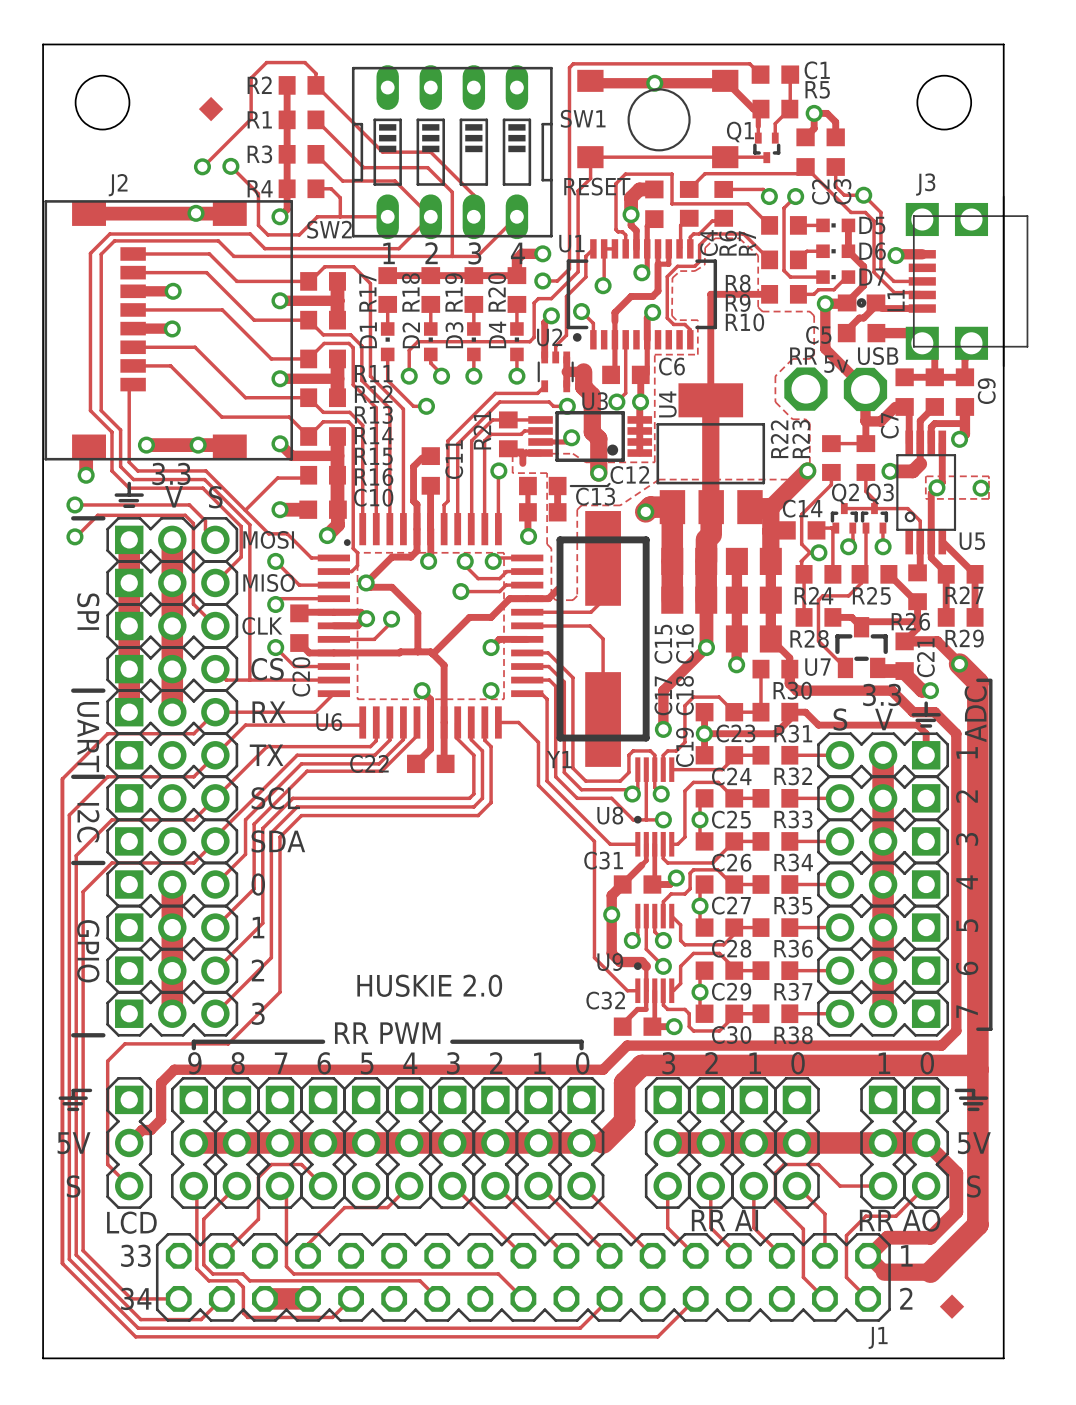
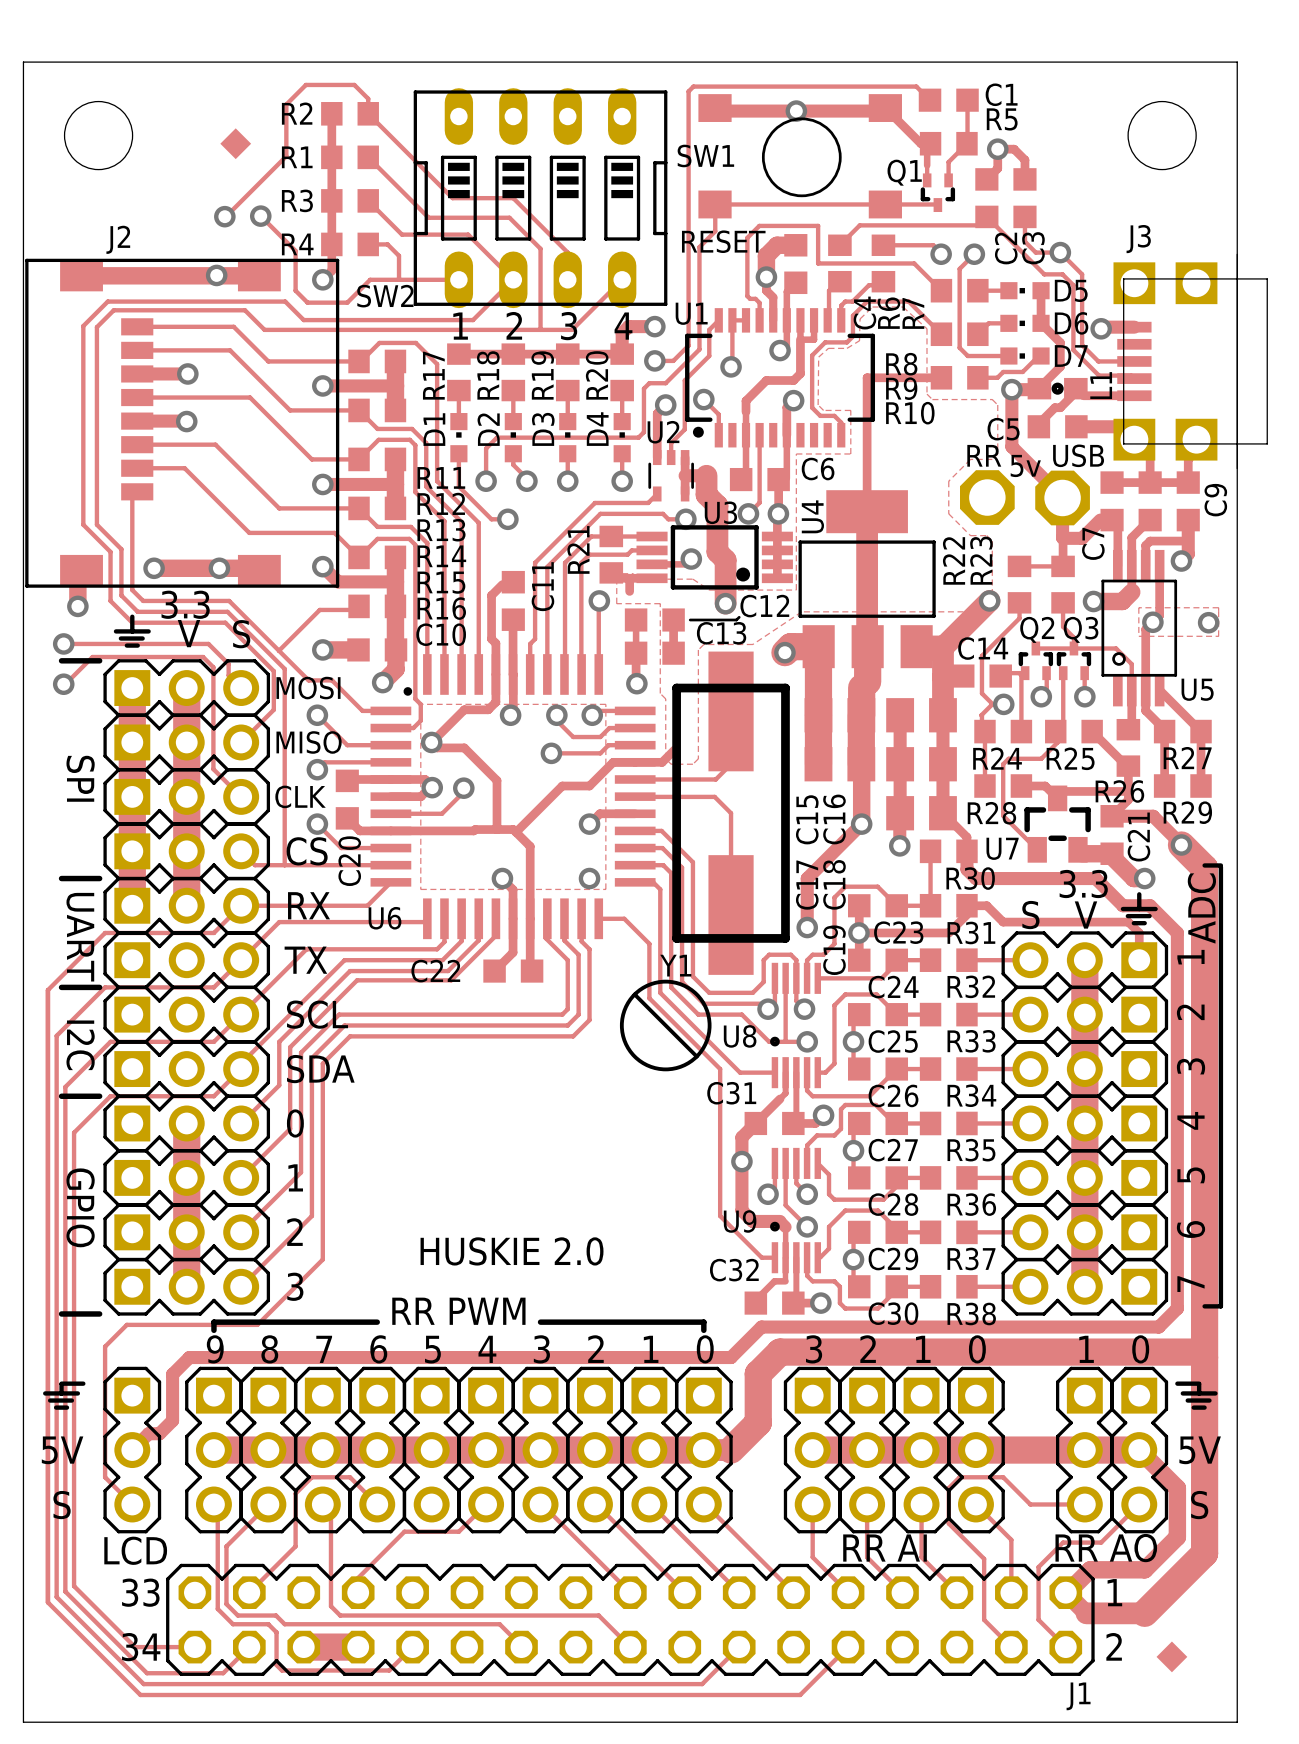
drawing: none -> [619, 979, 712, 1072]
line: none -> (634, 994) (696, 1056)

